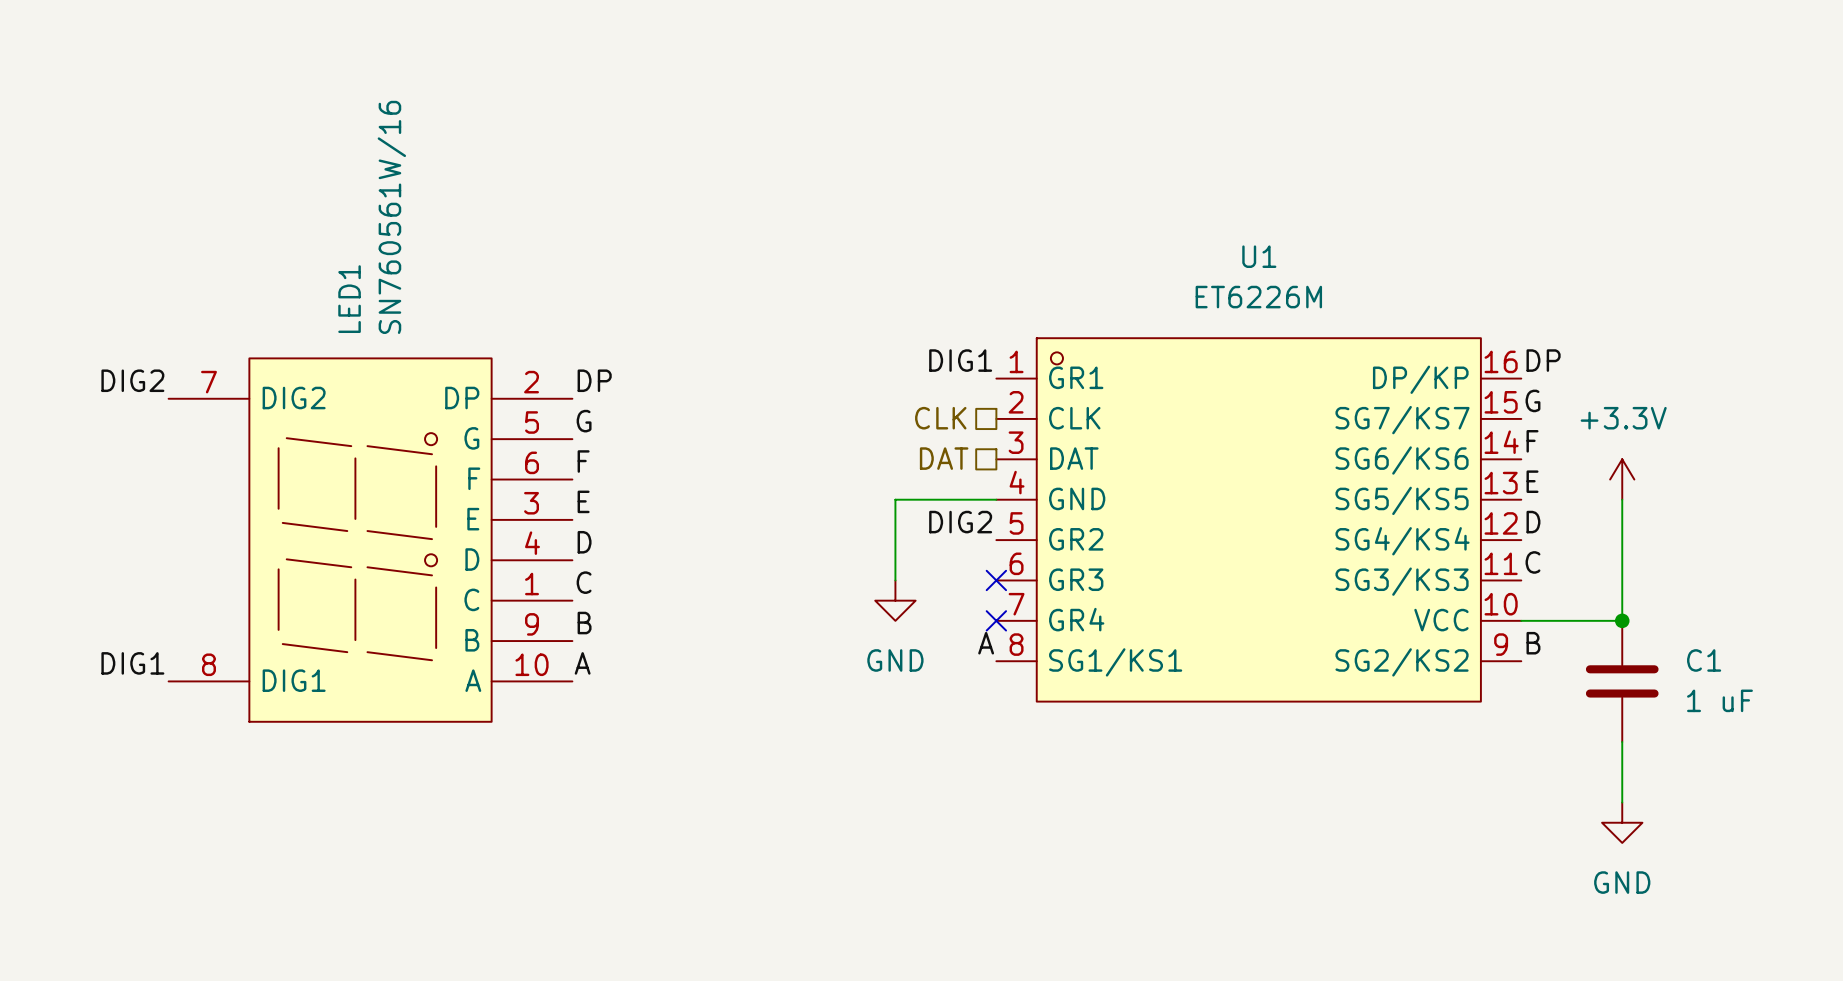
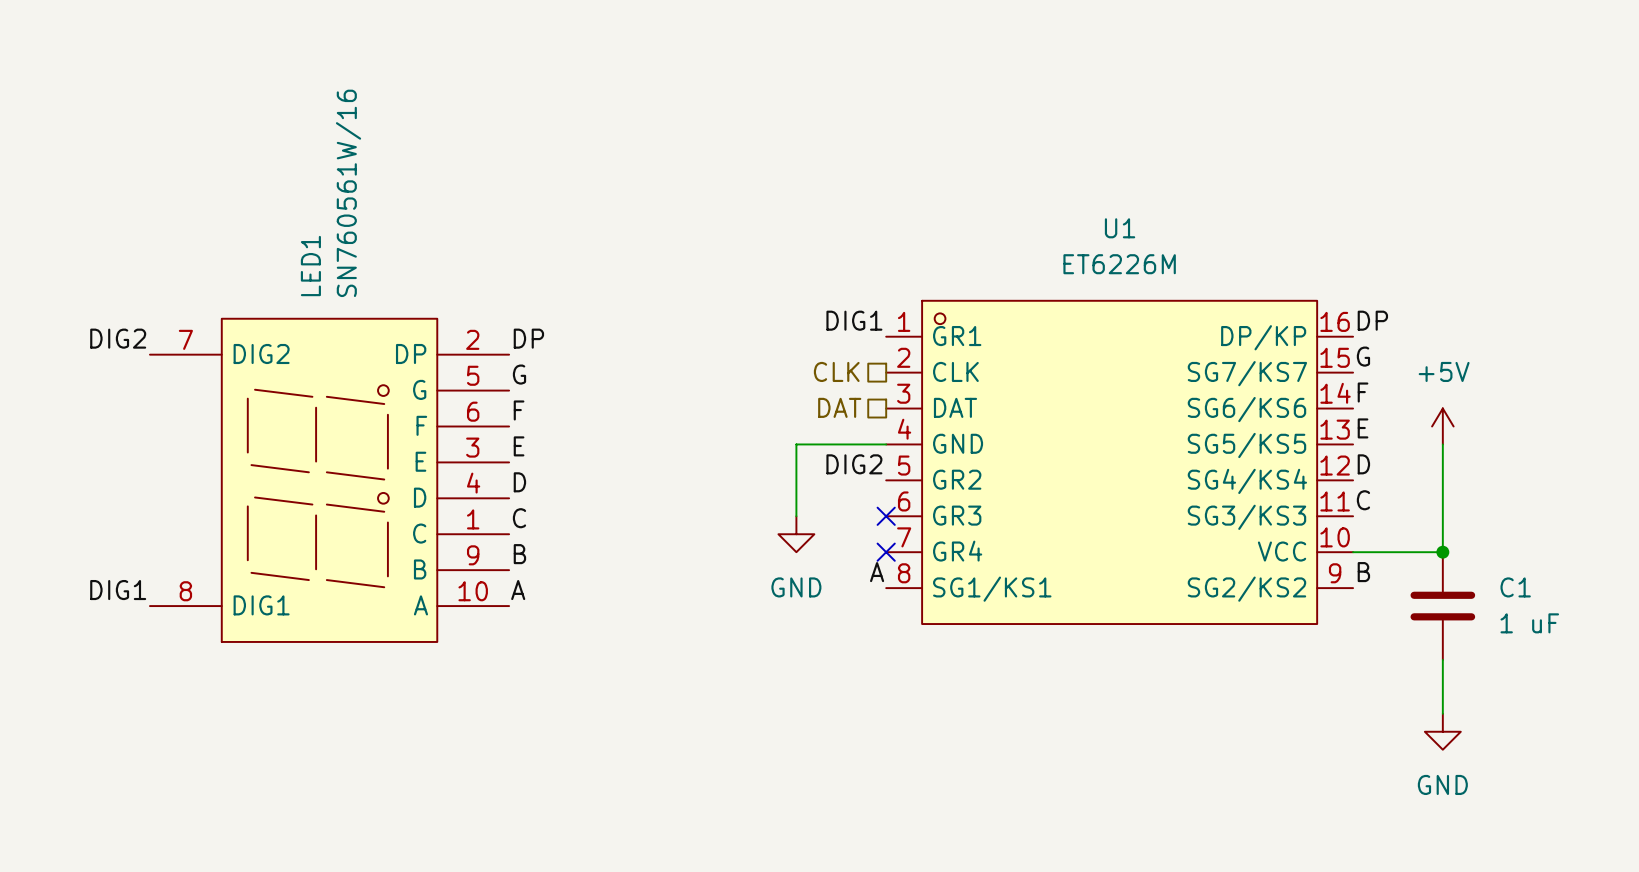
power symbol: +3.3V (1622, 479) -> +5V (1442, 426)

